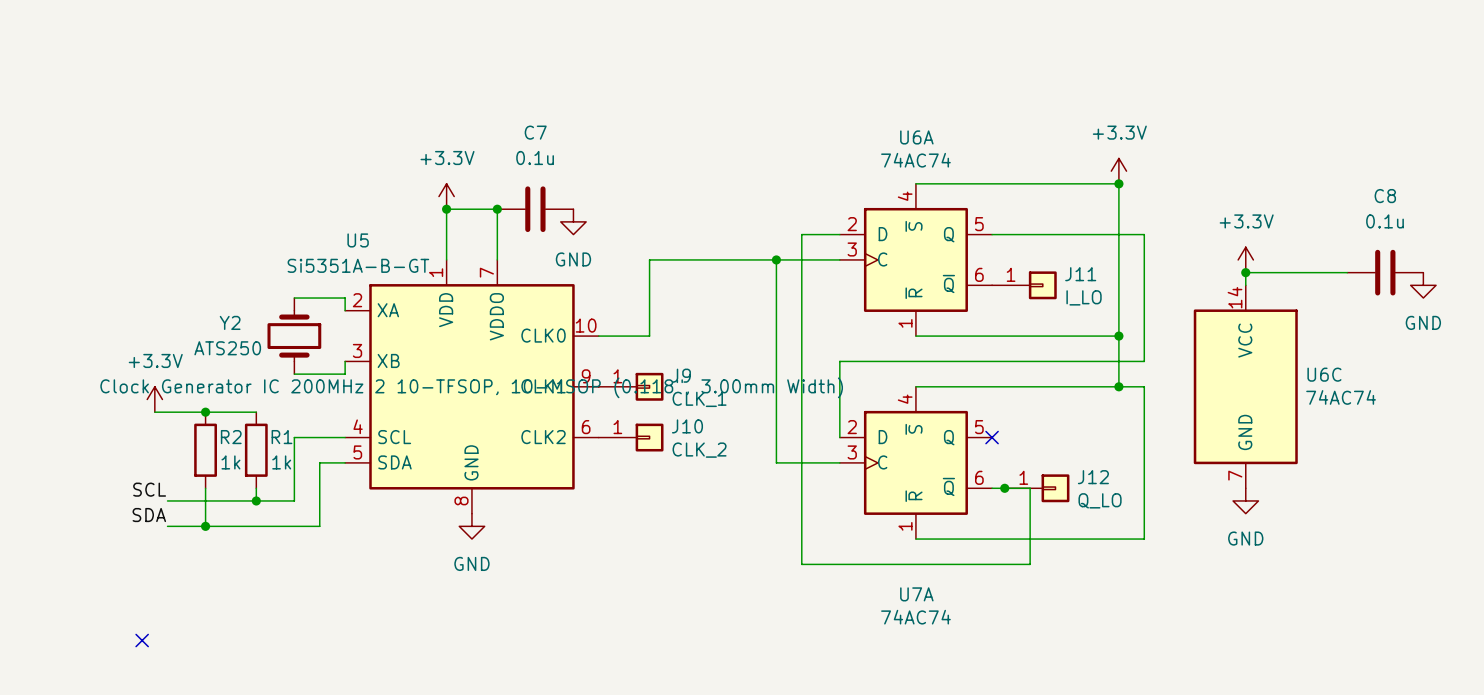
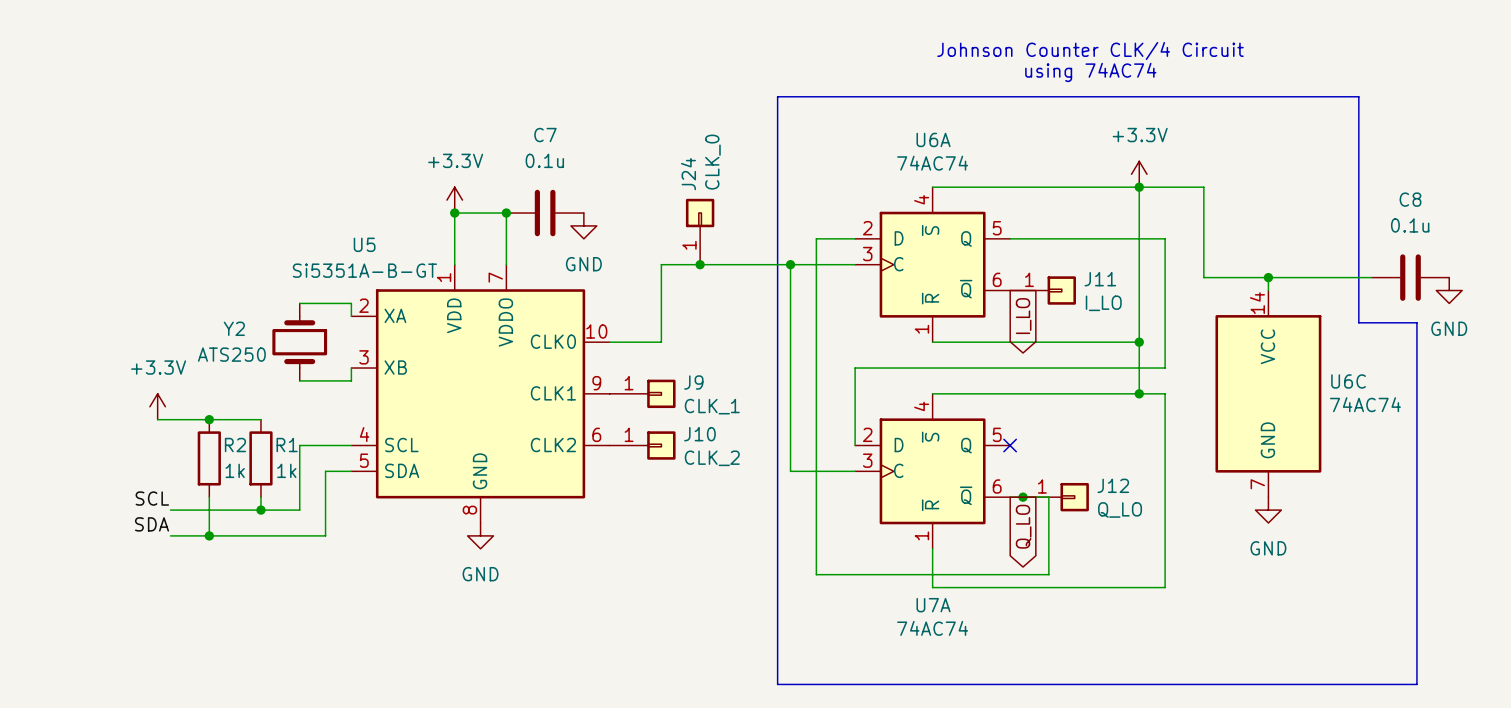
text: none -> Johnson Counter CLK/4 Circuit (1090, 51)
text: none -> using 74AC74 (1090, 72)
line: none -> (777, 96) (777, 684) (1416, 684) (1416, 322) (1358, 322) (1358, 96) (777, 96)
wire: none -> (1139, 187) (1203, 187) (1203, 277) (1268, 277)
J24: none -> CLK_0 (700, 231)
junction: none -> (700, 264)
power symbol: +3.3V (1245, 259) -> none
global label: none -> I_LO (1023, 316)
U5 text: Clock Generator IC 200MHz 2 10-TFSOP, 10-MSOP (0.118", 3.00mm Width) (471, 387) -> none
global label: none -> Q_LO (1023, 526)
wire: (915, 539) (1144, 539) -> (932, 548) (932, 587) (1165, 587) (1165, 548)
no-connect mark: (142, 640) -> none

